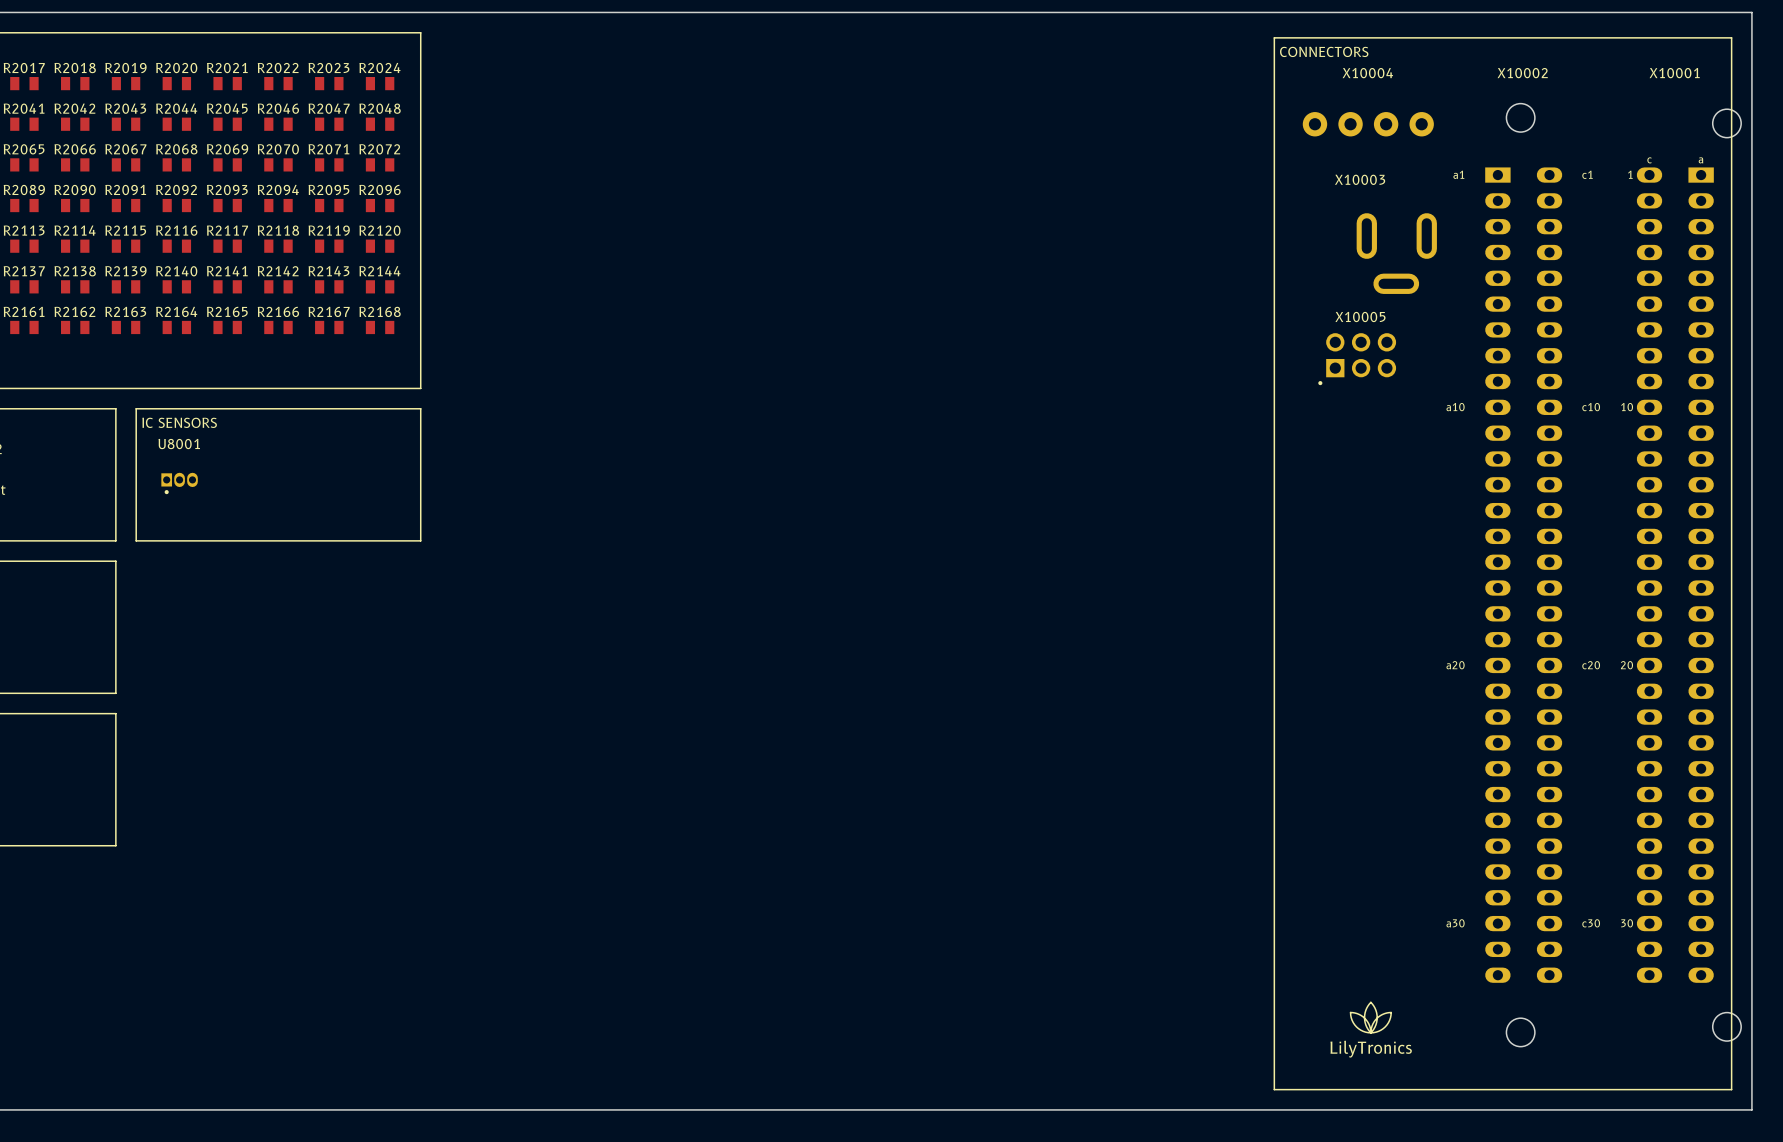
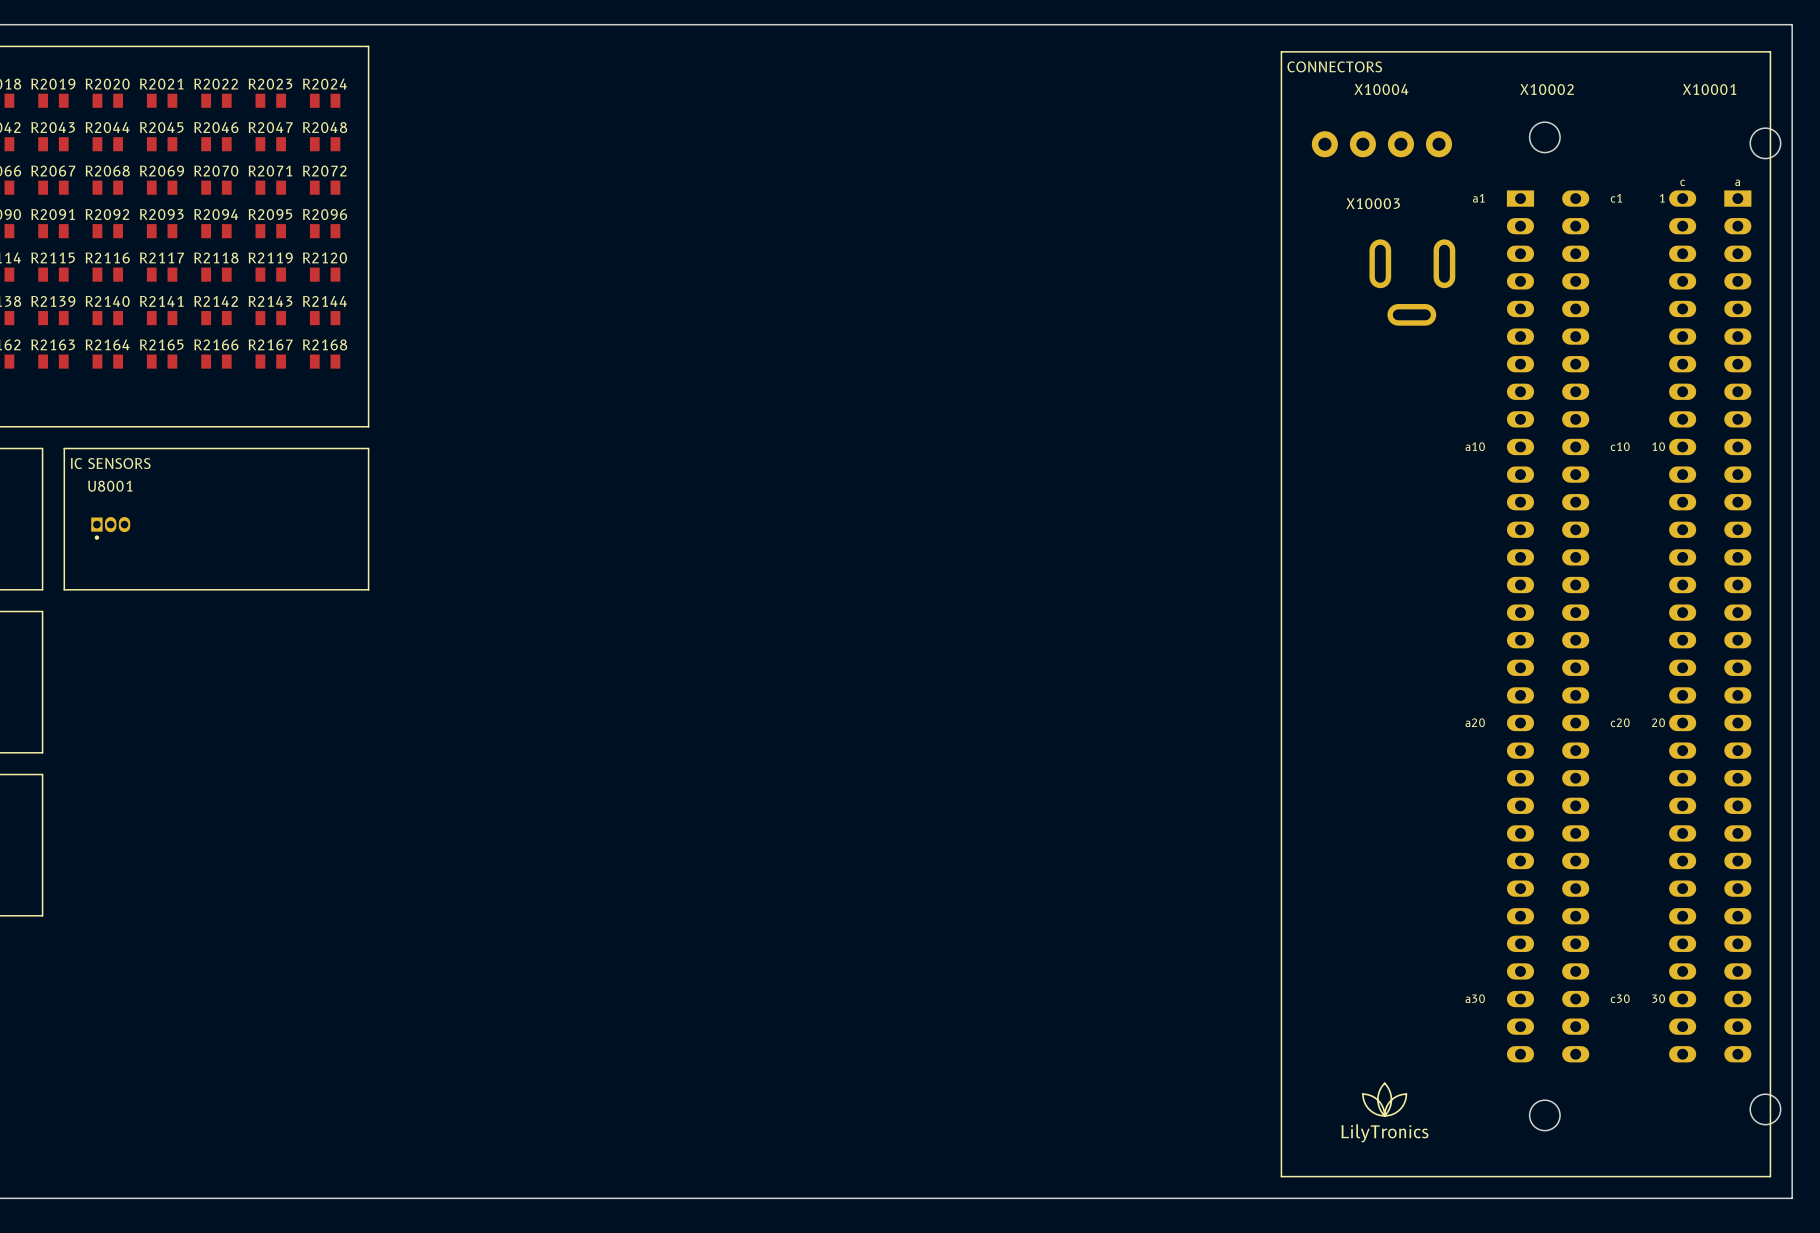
X10005: (1357, 359) -> none

